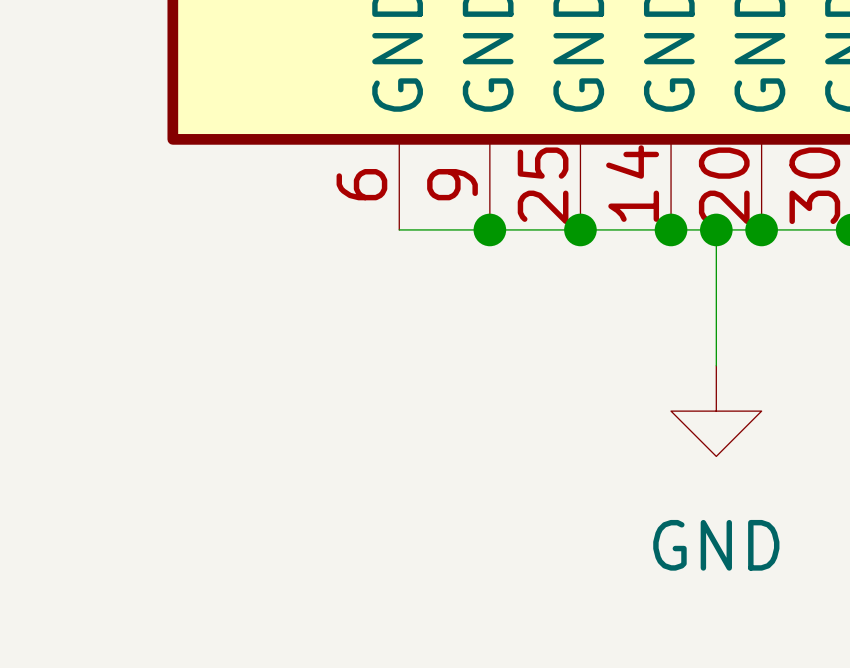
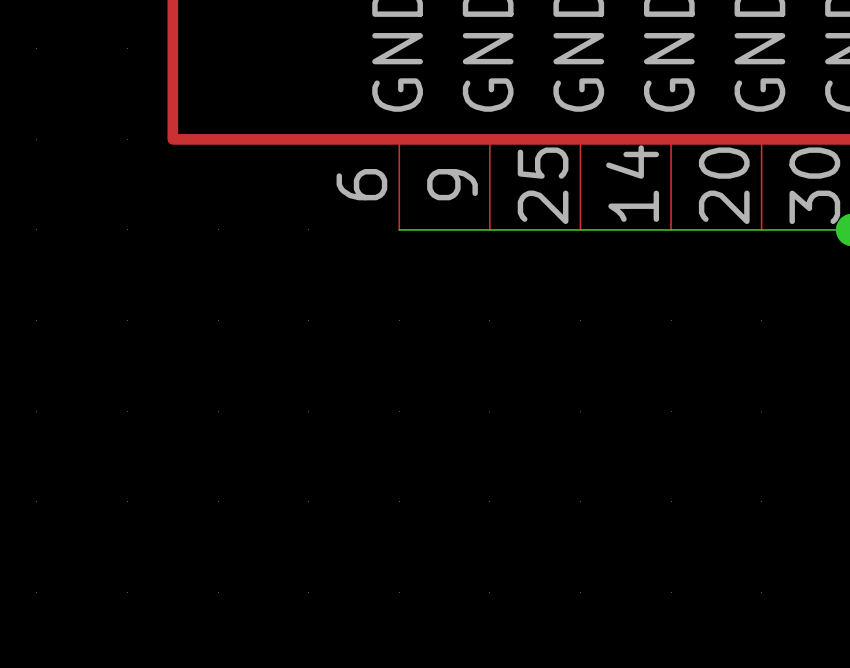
junction: (489, 229) -> none
junction: (580, 229) -> none
junction: (671, 229) -> none
wire: (716, 229) (716, 365) -> none
junction: (716, 229) -> none
junction: (761, 229) -> none
power symbol: GND (716, 411) -> none

